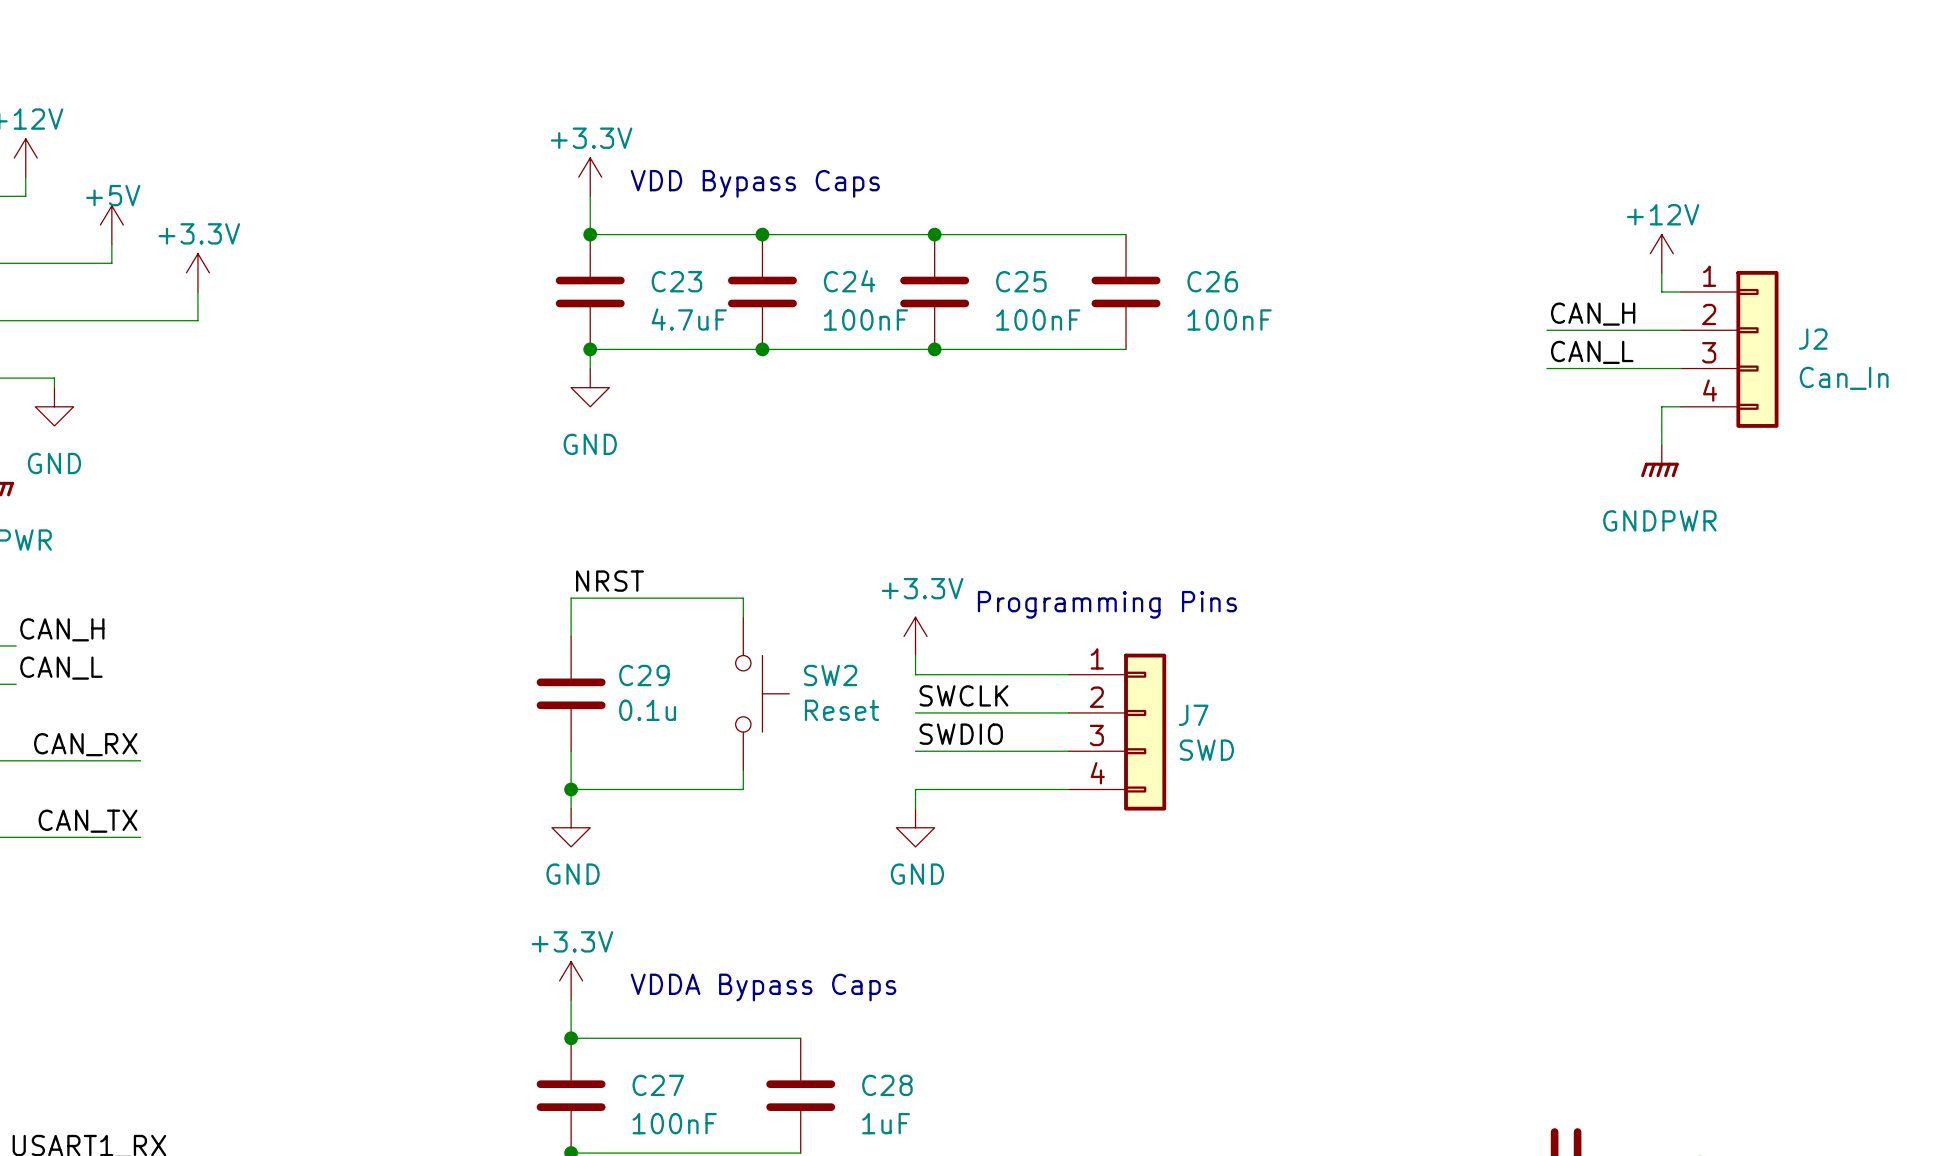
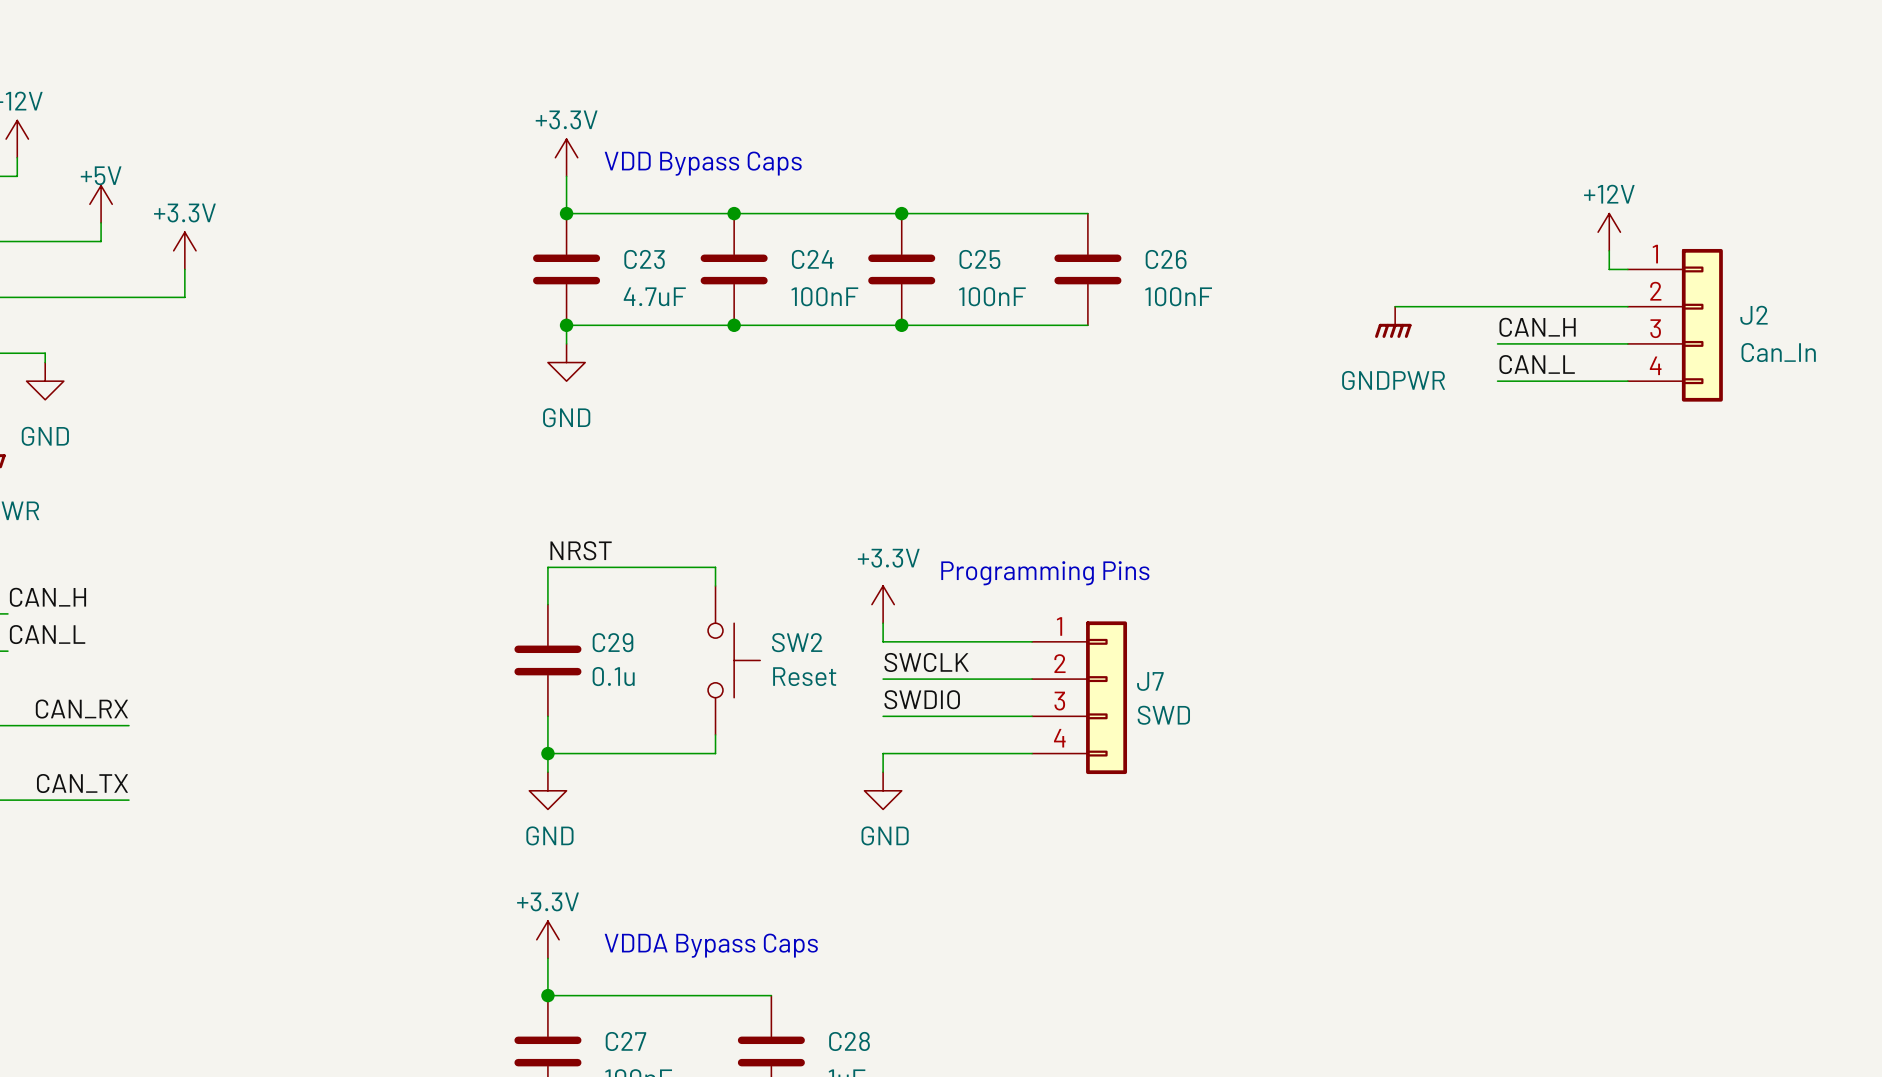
label: CAN_H (1593, 314) -> none
wire: none -> (1395, 306) (1497, 306)
label: CAN_L (1592, 352) -> CAN_H (1537, 327)
label: none -> CAN_L (1537, 364)
wire: (1661, 406) (1661, 445) -> (1609, 381) (1497, 381)
power symbol position: GNDPWR (1659, 461) -> GNDPWR (1393, 322)

